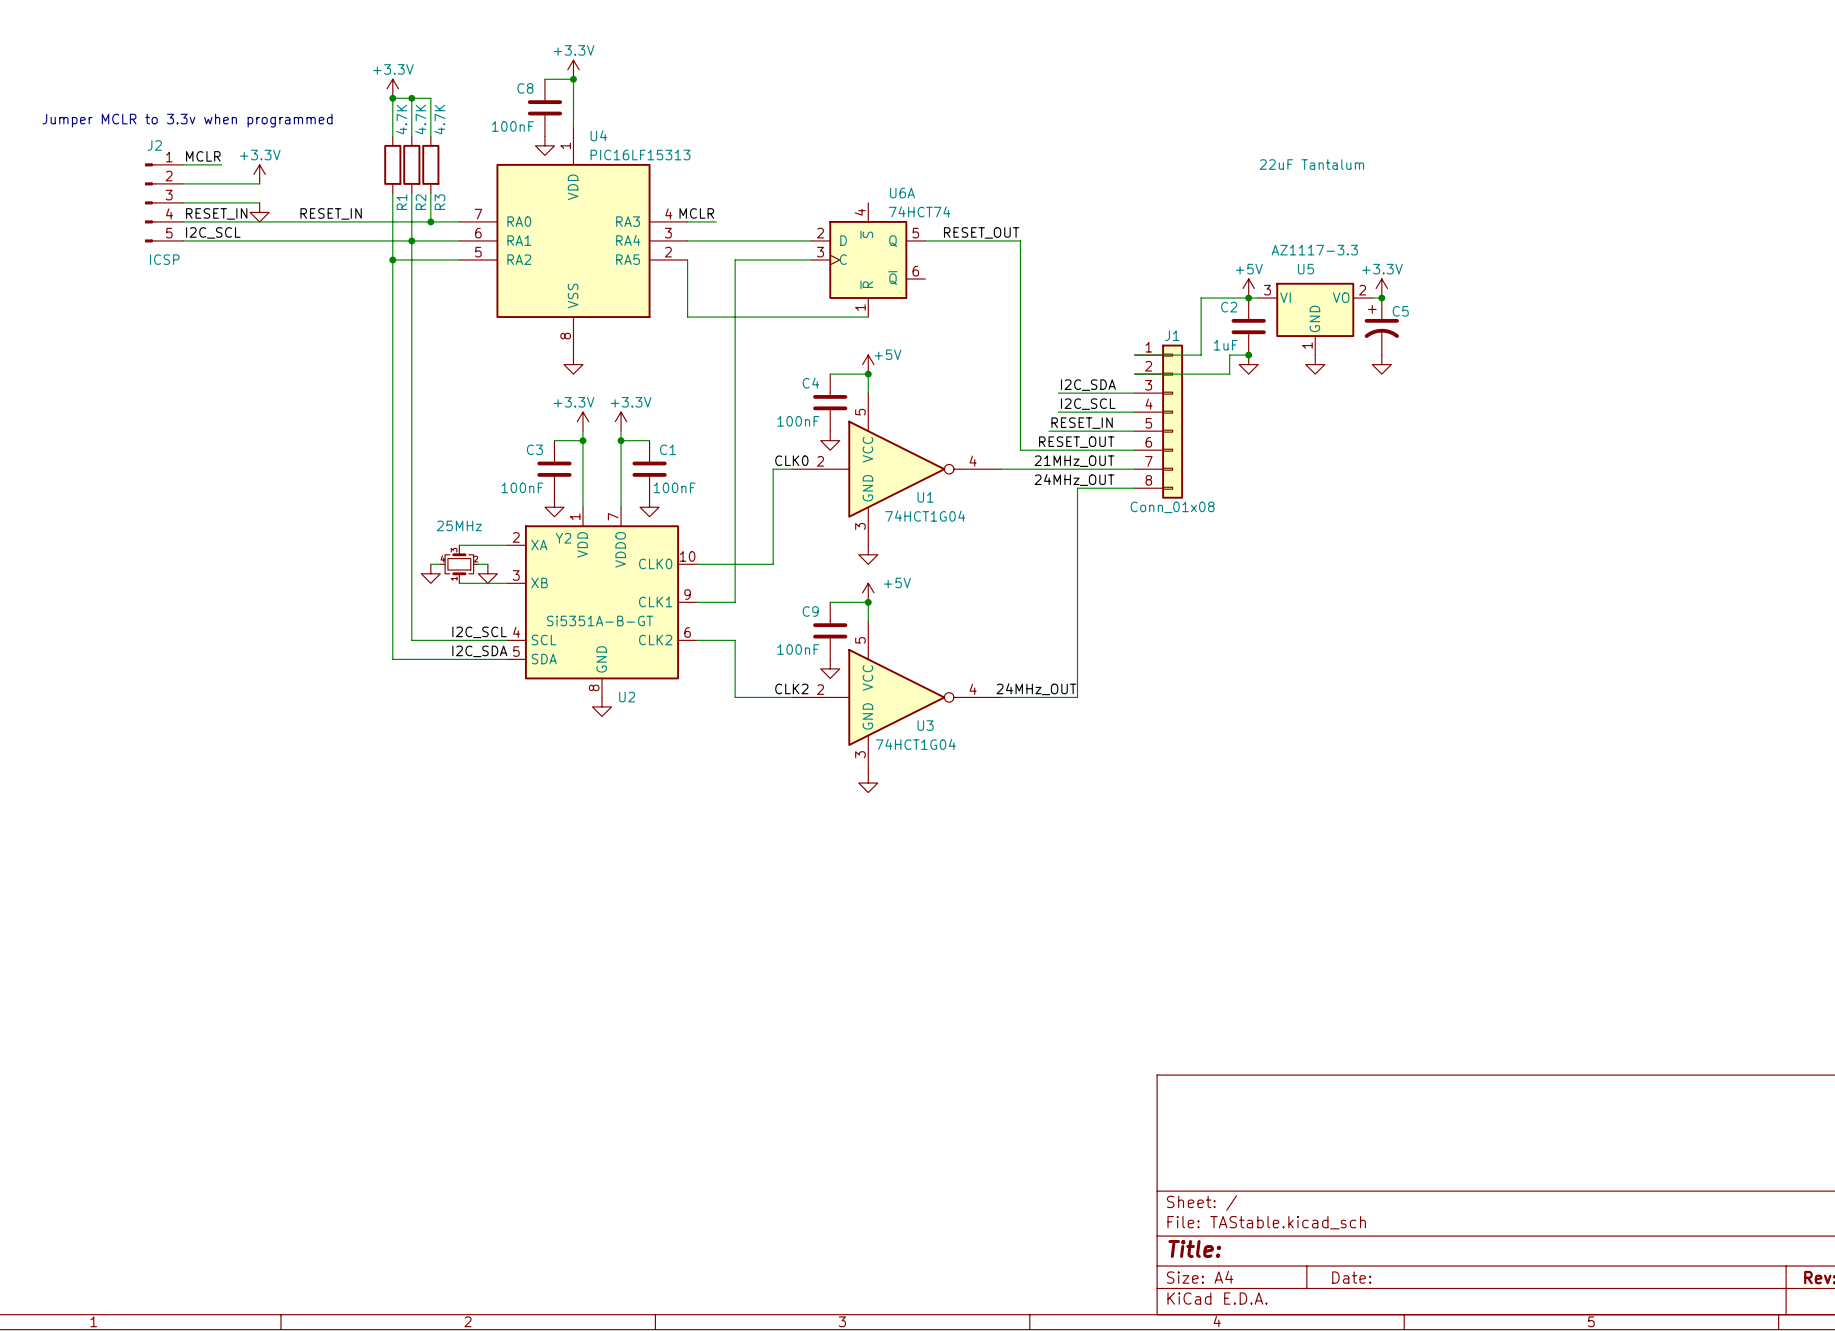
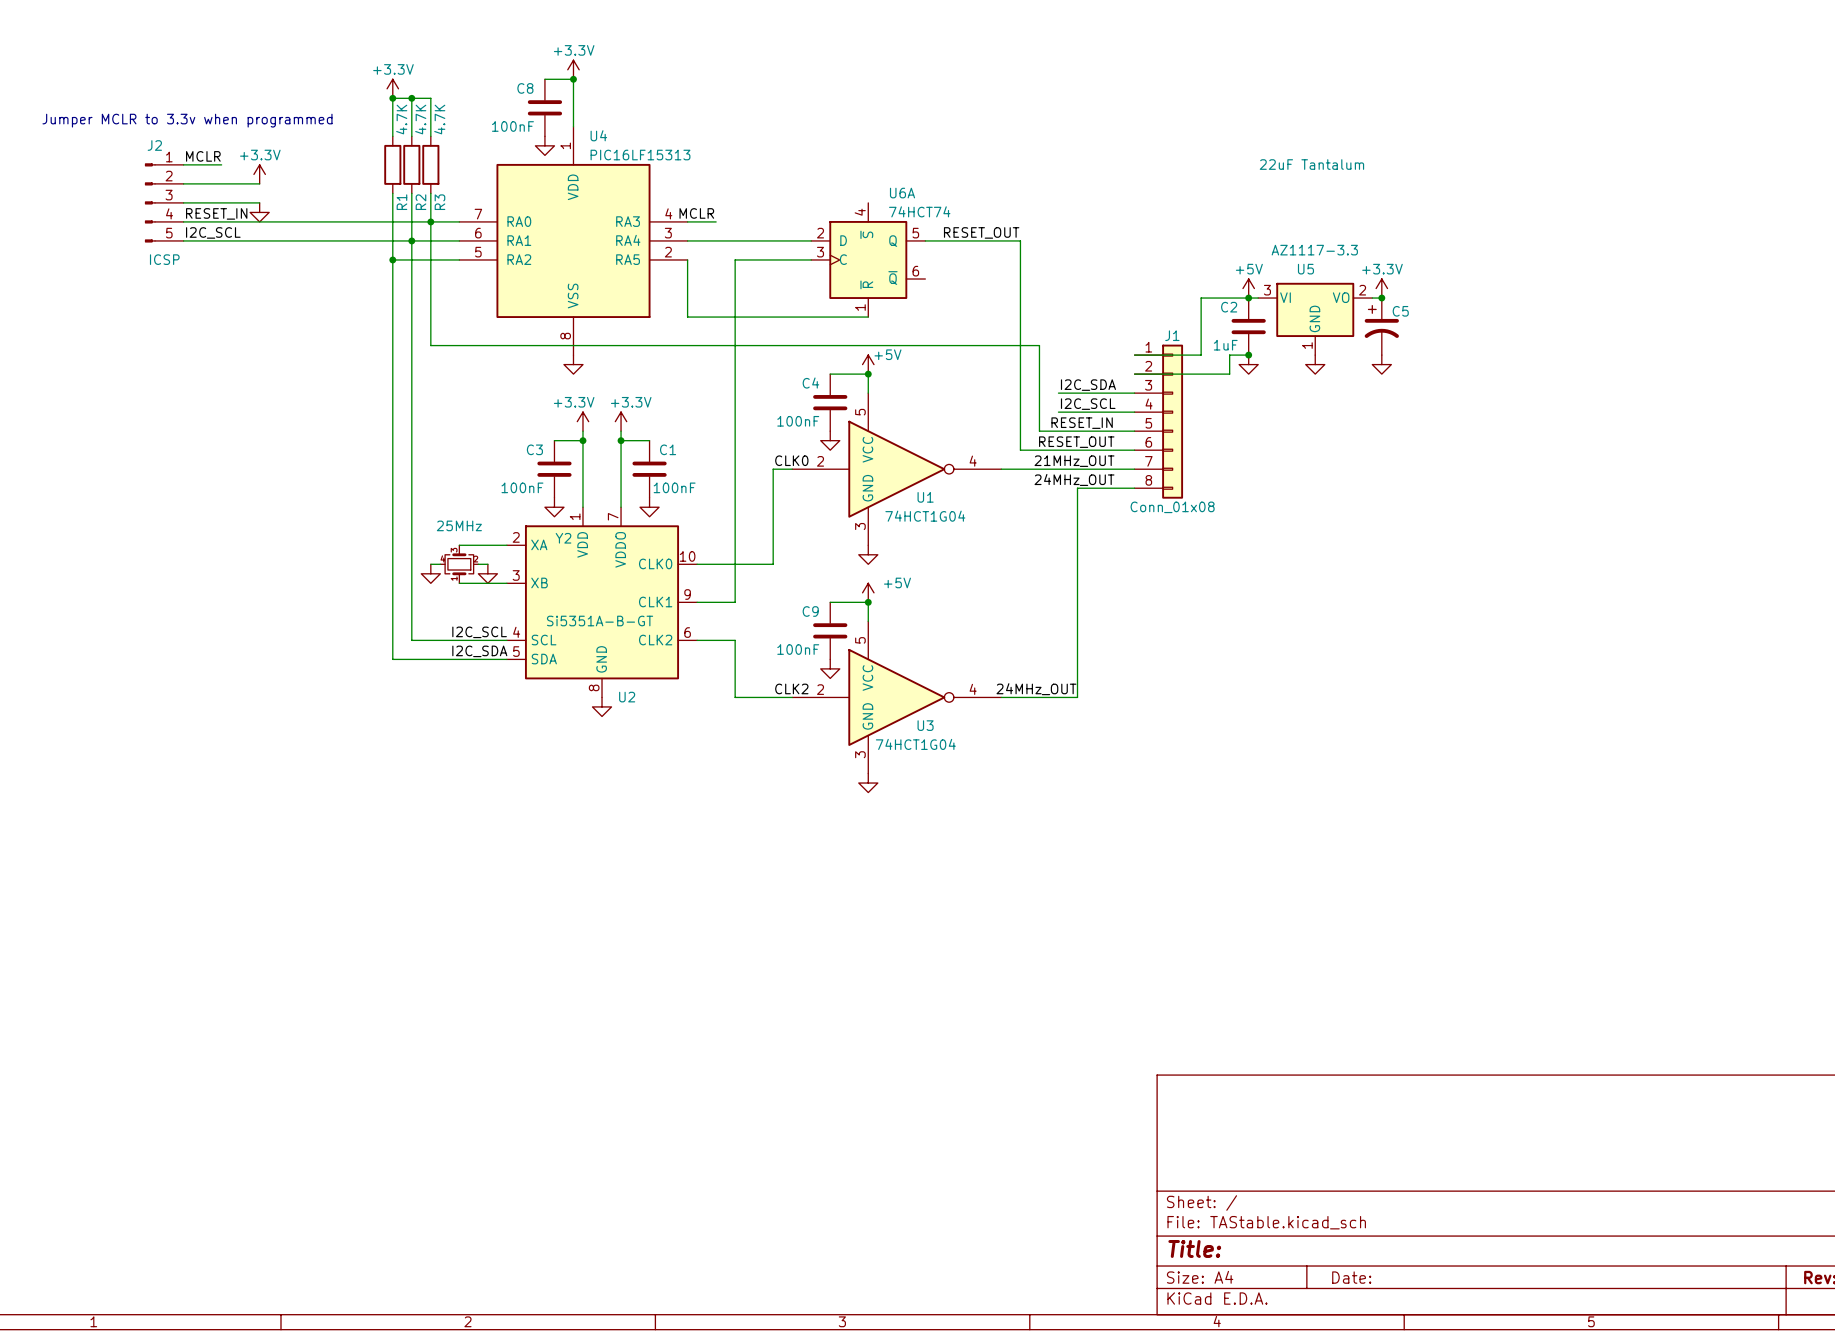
label: RESET_IN (331, 213) -> none
wire: none -> (430, 221) (430, 345) (1039, 345) (1039, 431) (1048, 431)

